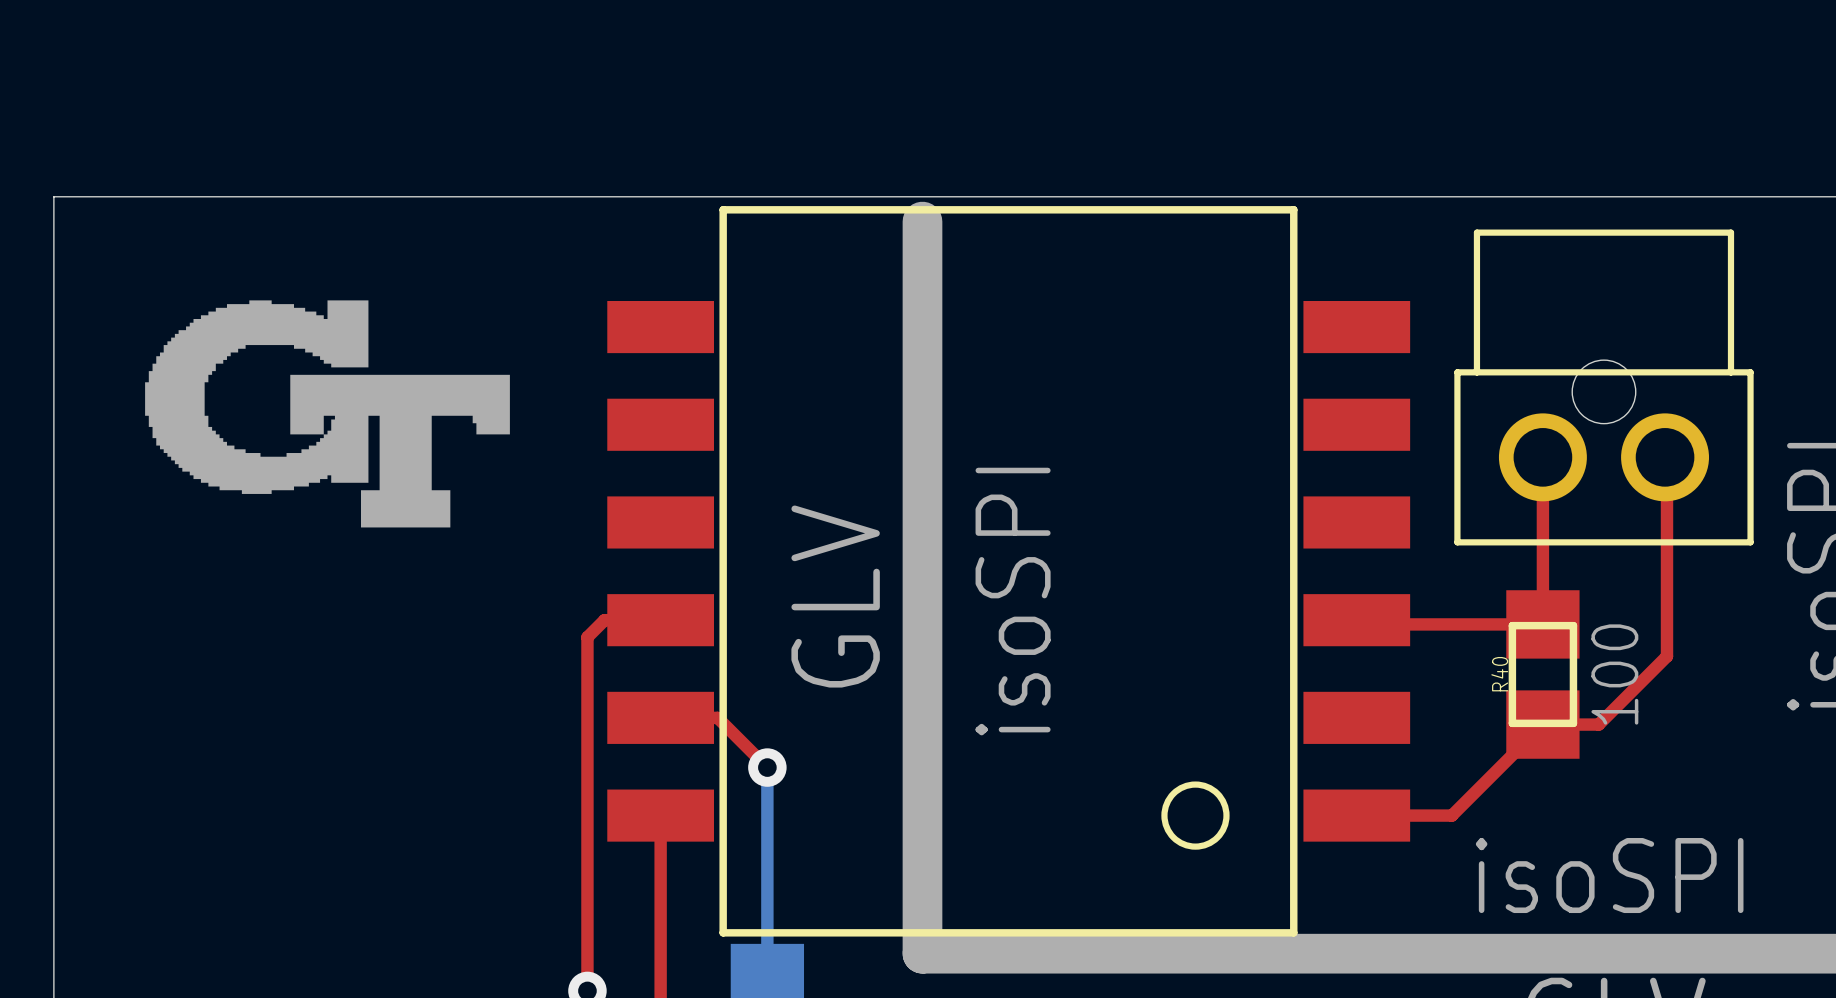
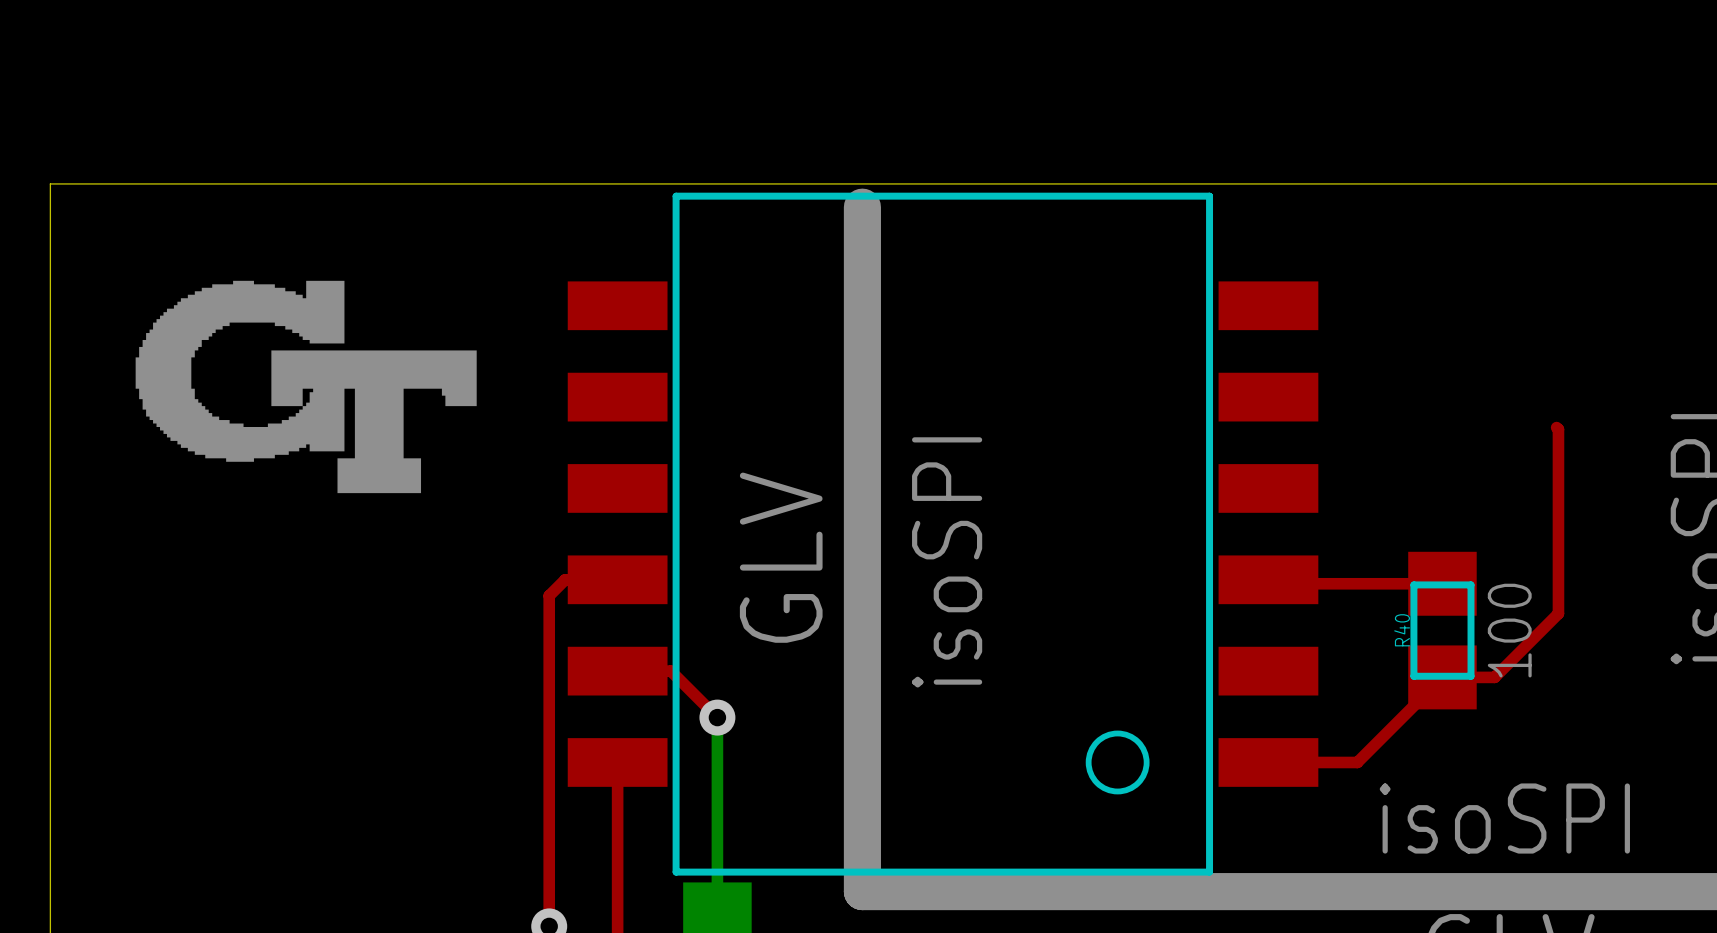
part: (1603, 387) -> none
top track: (1542, 457) (1542, 624) -> none

